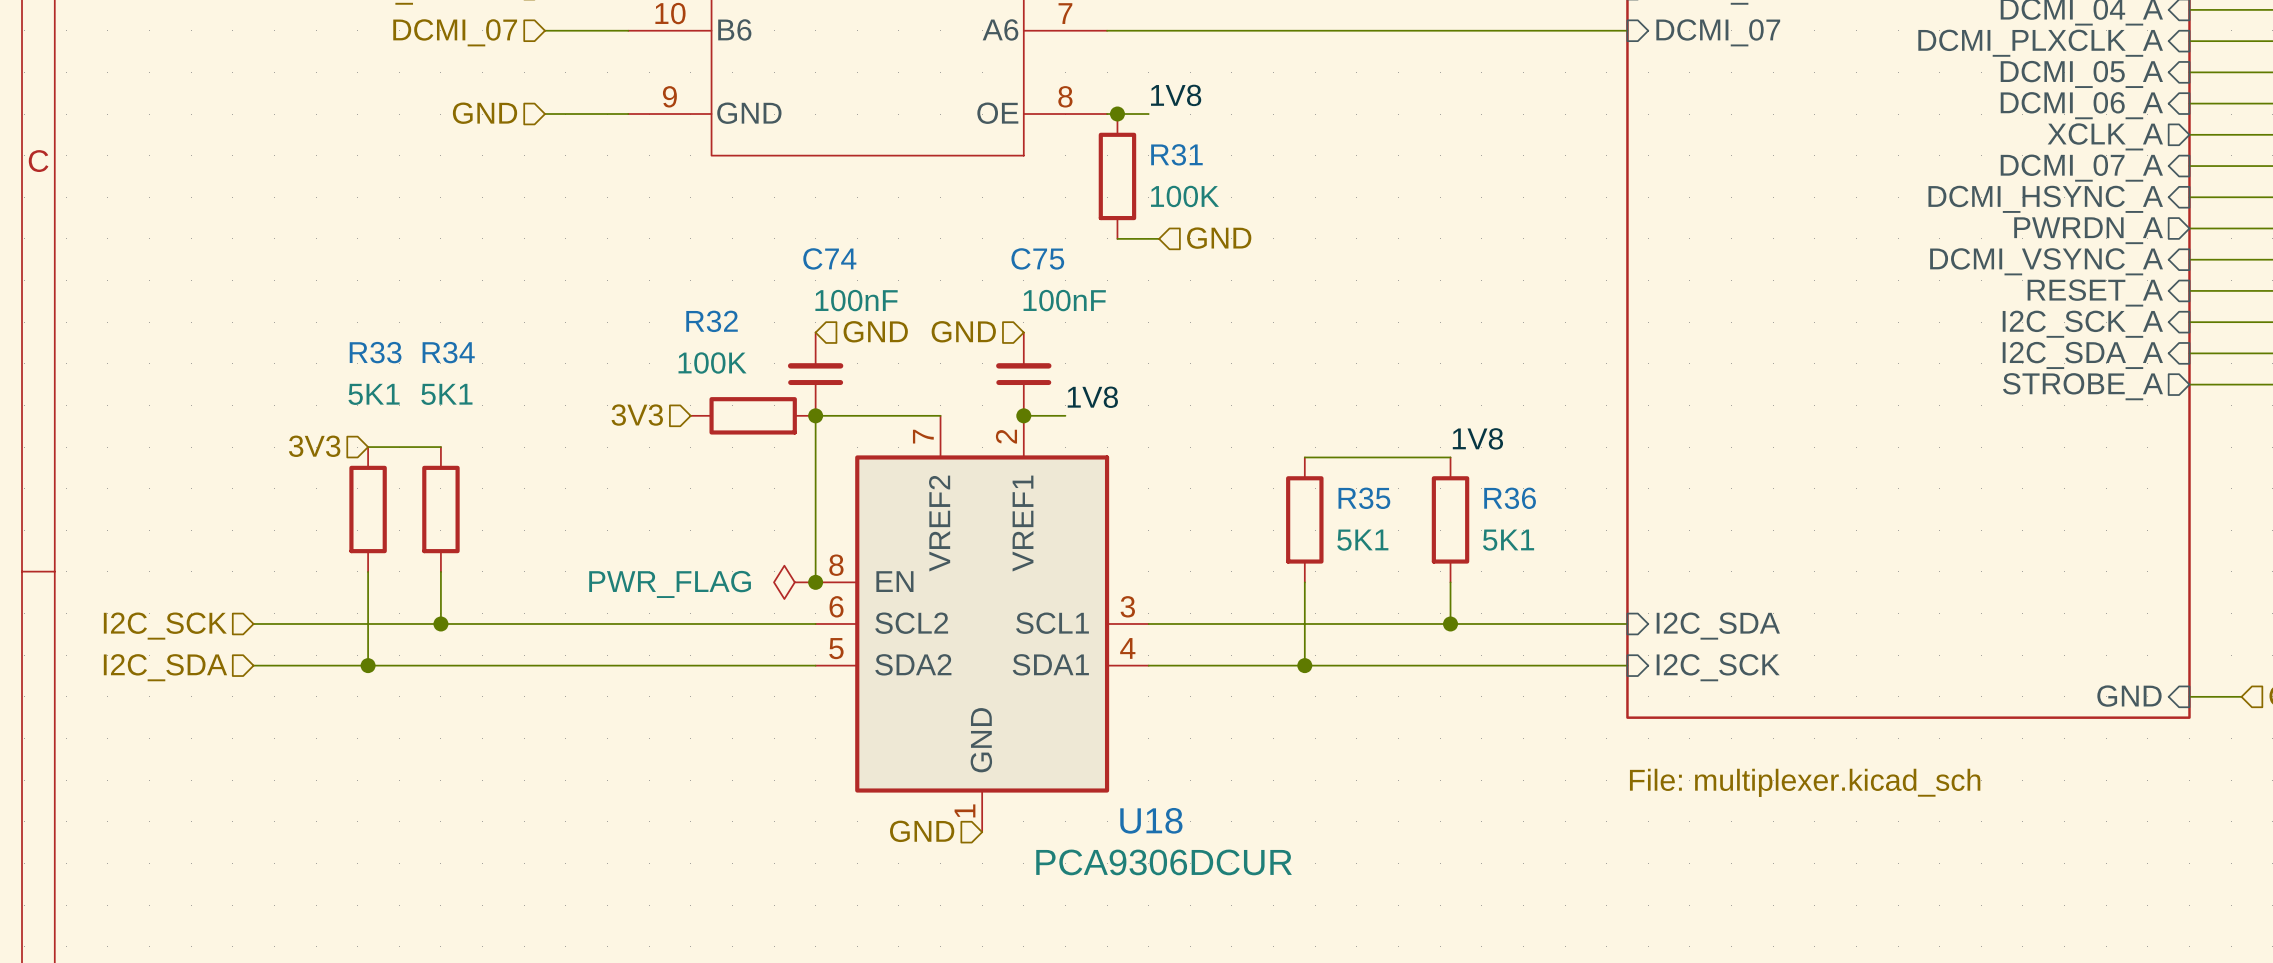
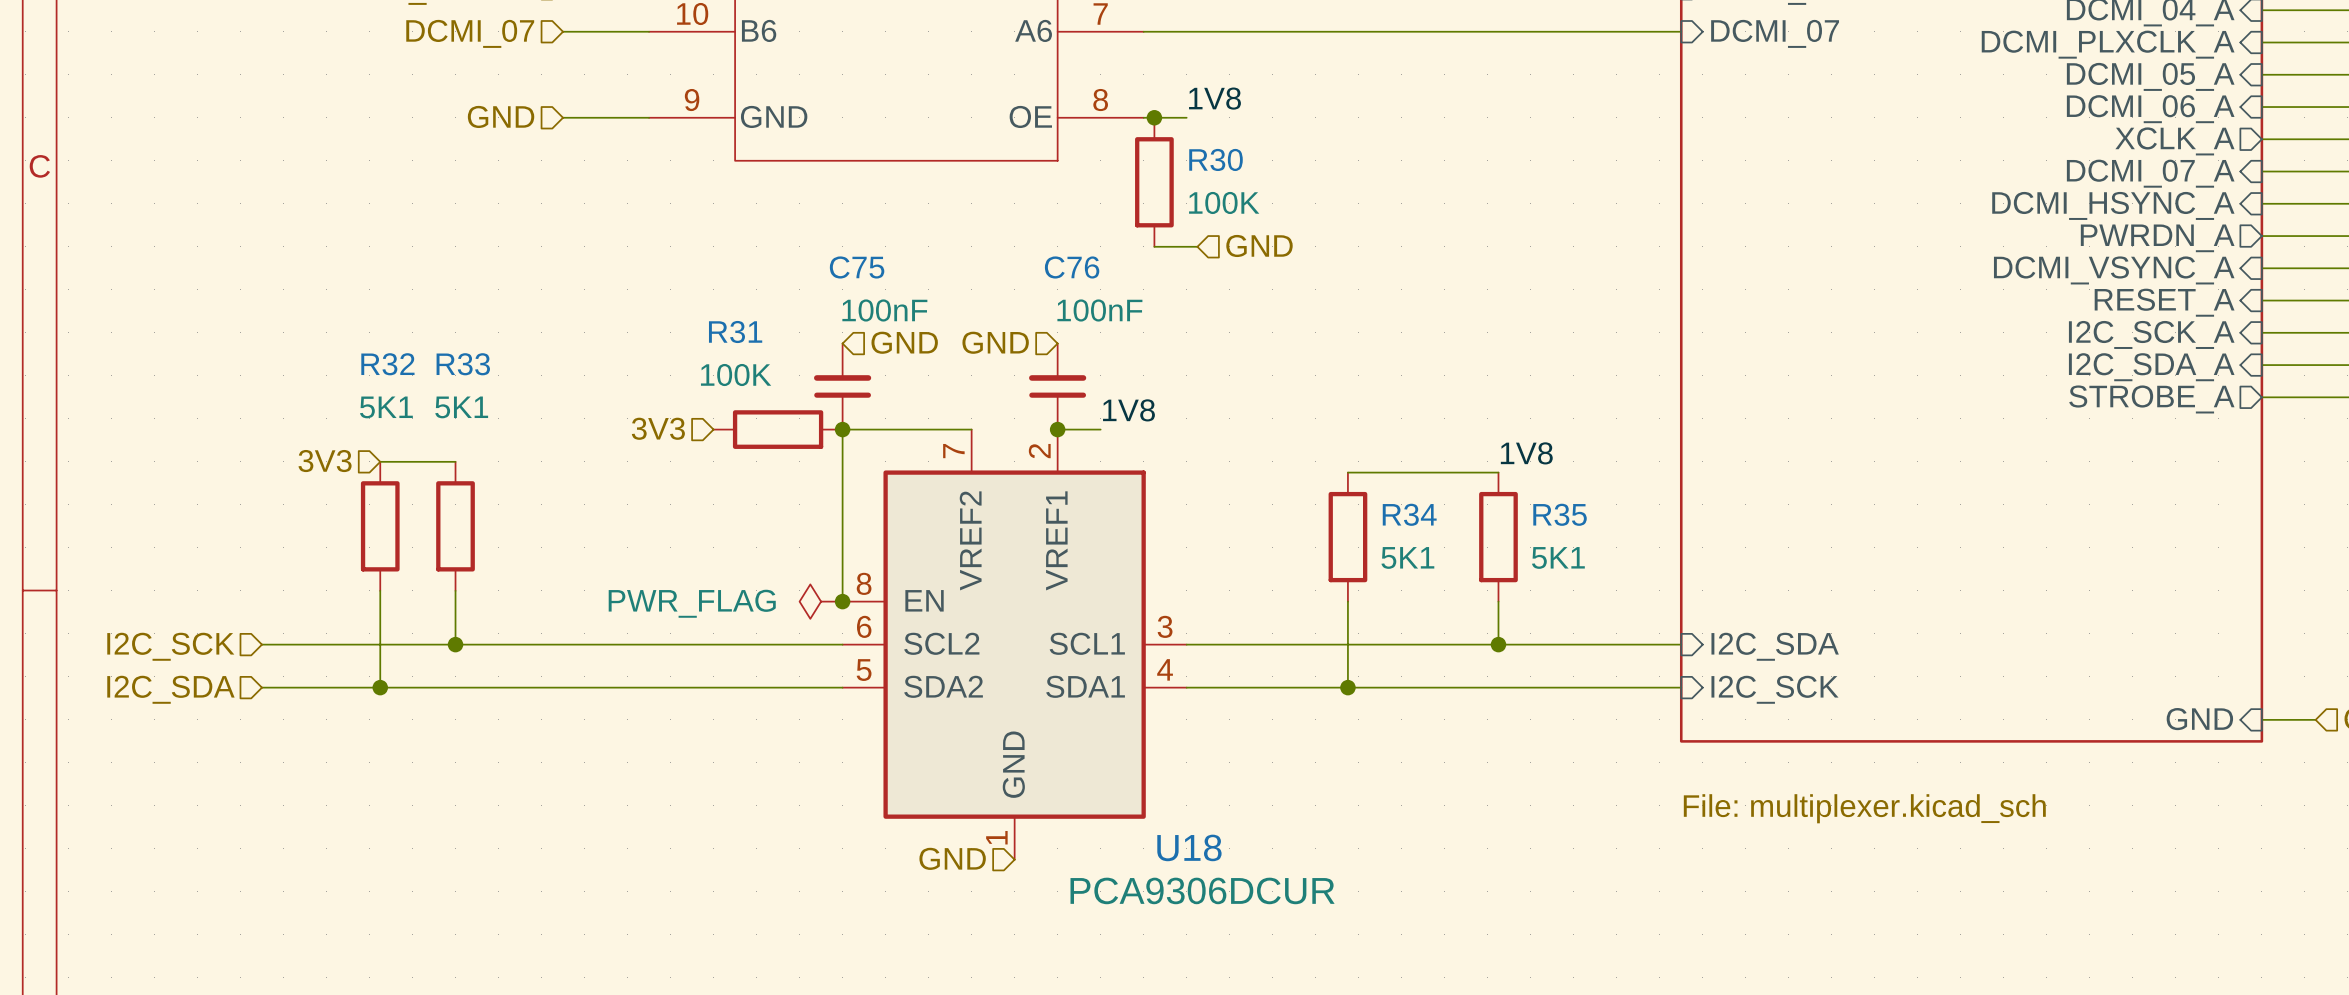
R31 name: R31 (1176, 154) -> R30 (1216, 159)
C74 name: C74 (829, 258) -> C75 (857, 267)
C75 name: C75 (1037, 258) -> C76 (1072, 267)
R32 name: R32 (712, 321) -> R31 (735, 332)
R33 name: R33 (375, 352) -> R32 (387, 364)
R34 name: R34 (448, 352) -> R33 (463, 364)
R35 name: R35 (1364, 498) -> R34 (1409, 514)
R36 name: R36 (1510, 498) -> R35 (1560, 514)

